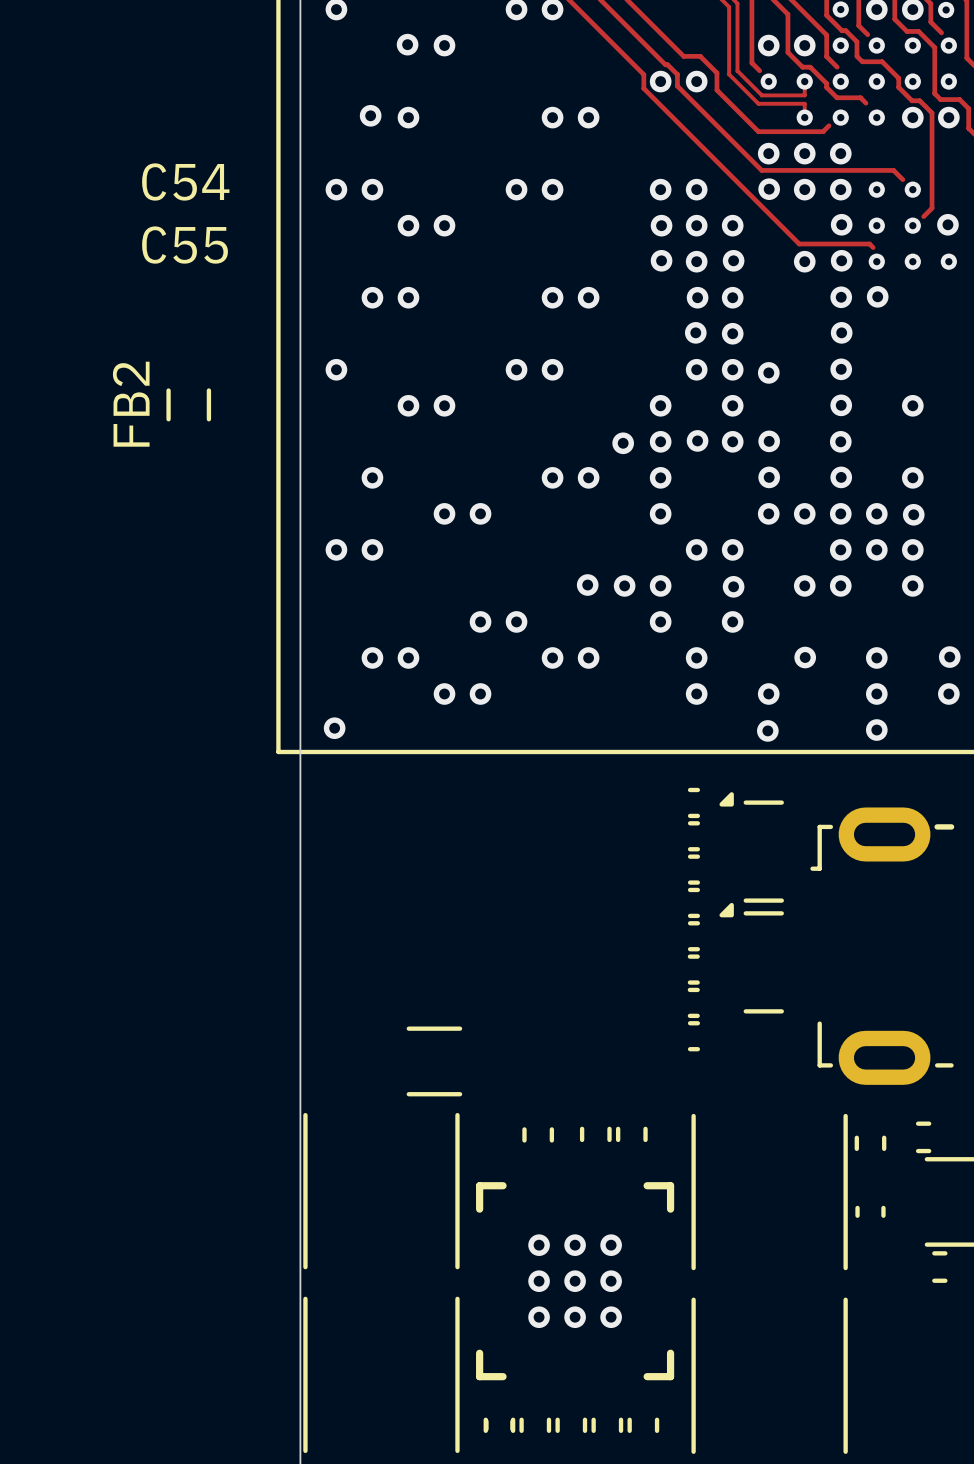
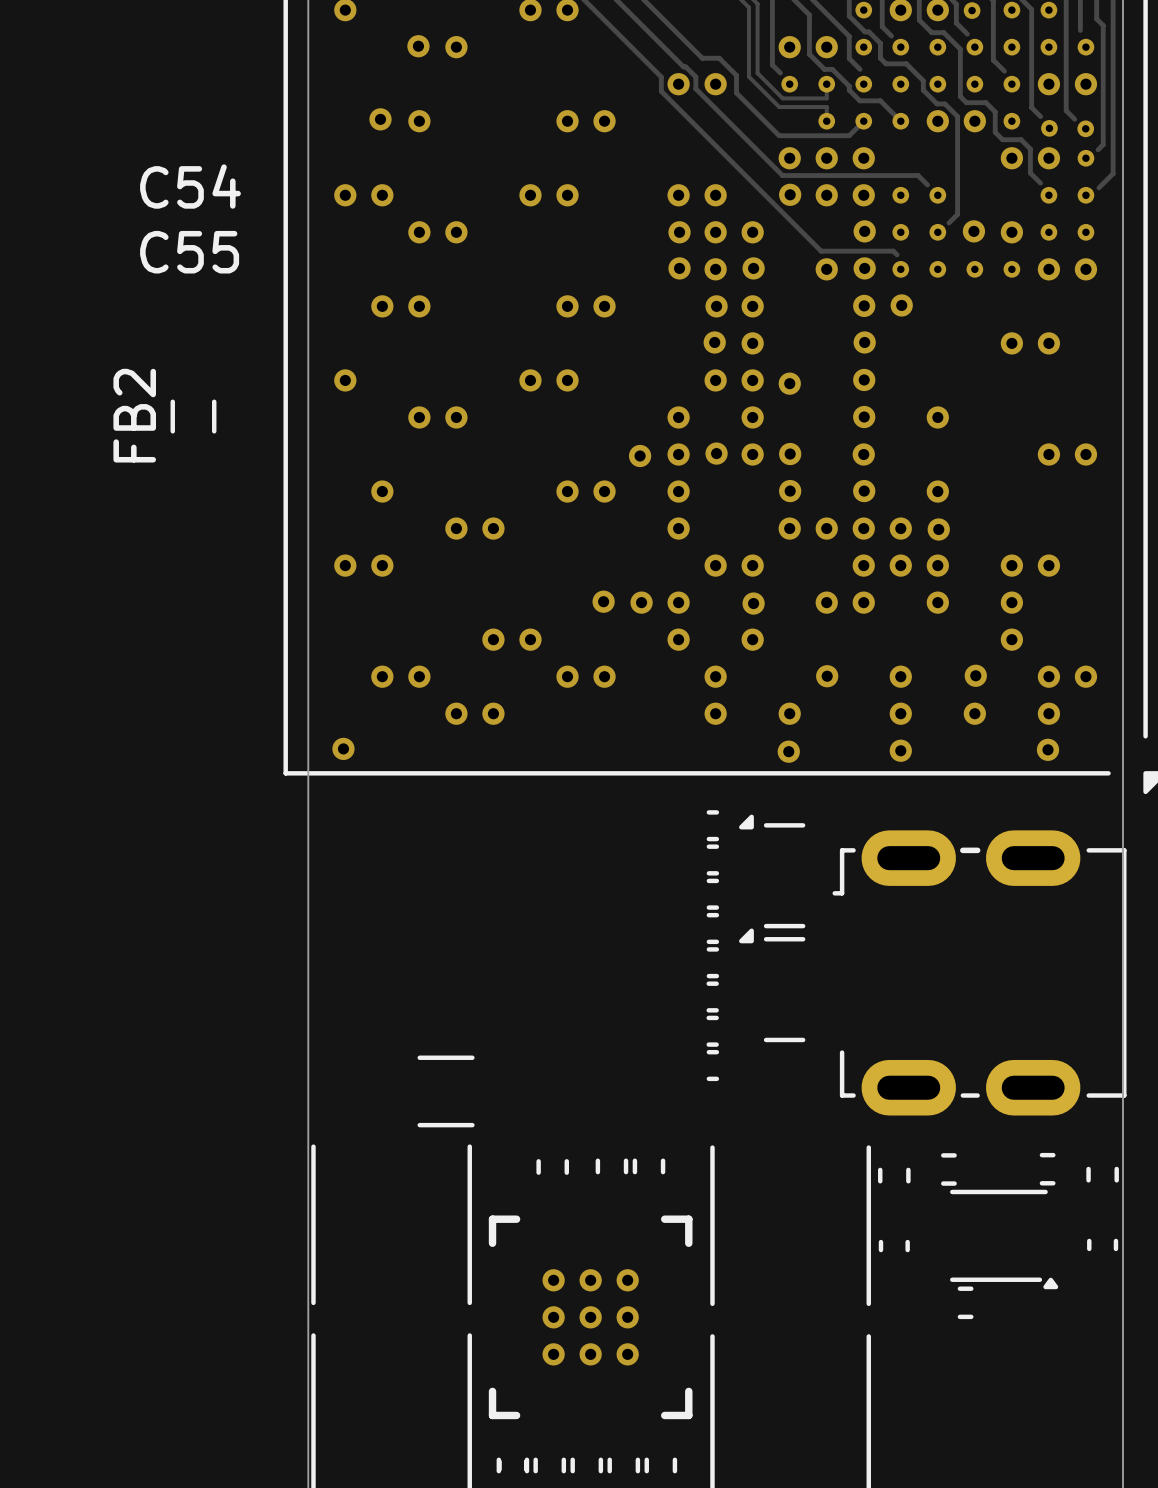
track: (856, 97) (860, 97) (865, 103) -> (880, 100) (900, 121)
track: (829, 125) (823, 131) -> (863, 121) (849, 135) (845, 135)

